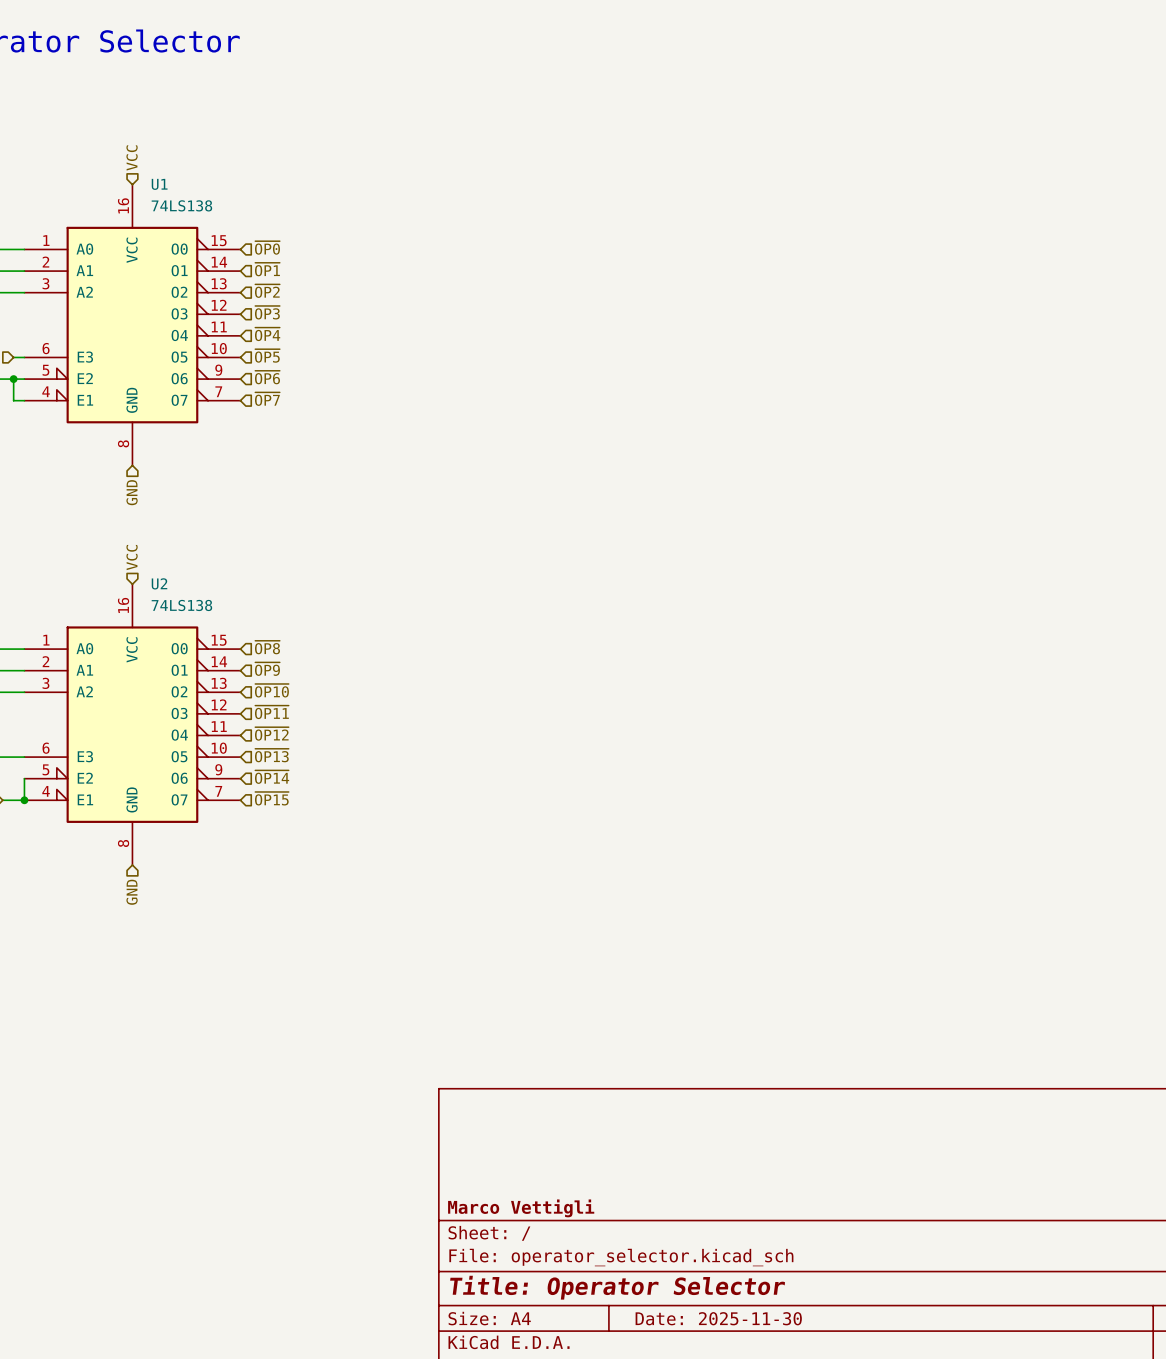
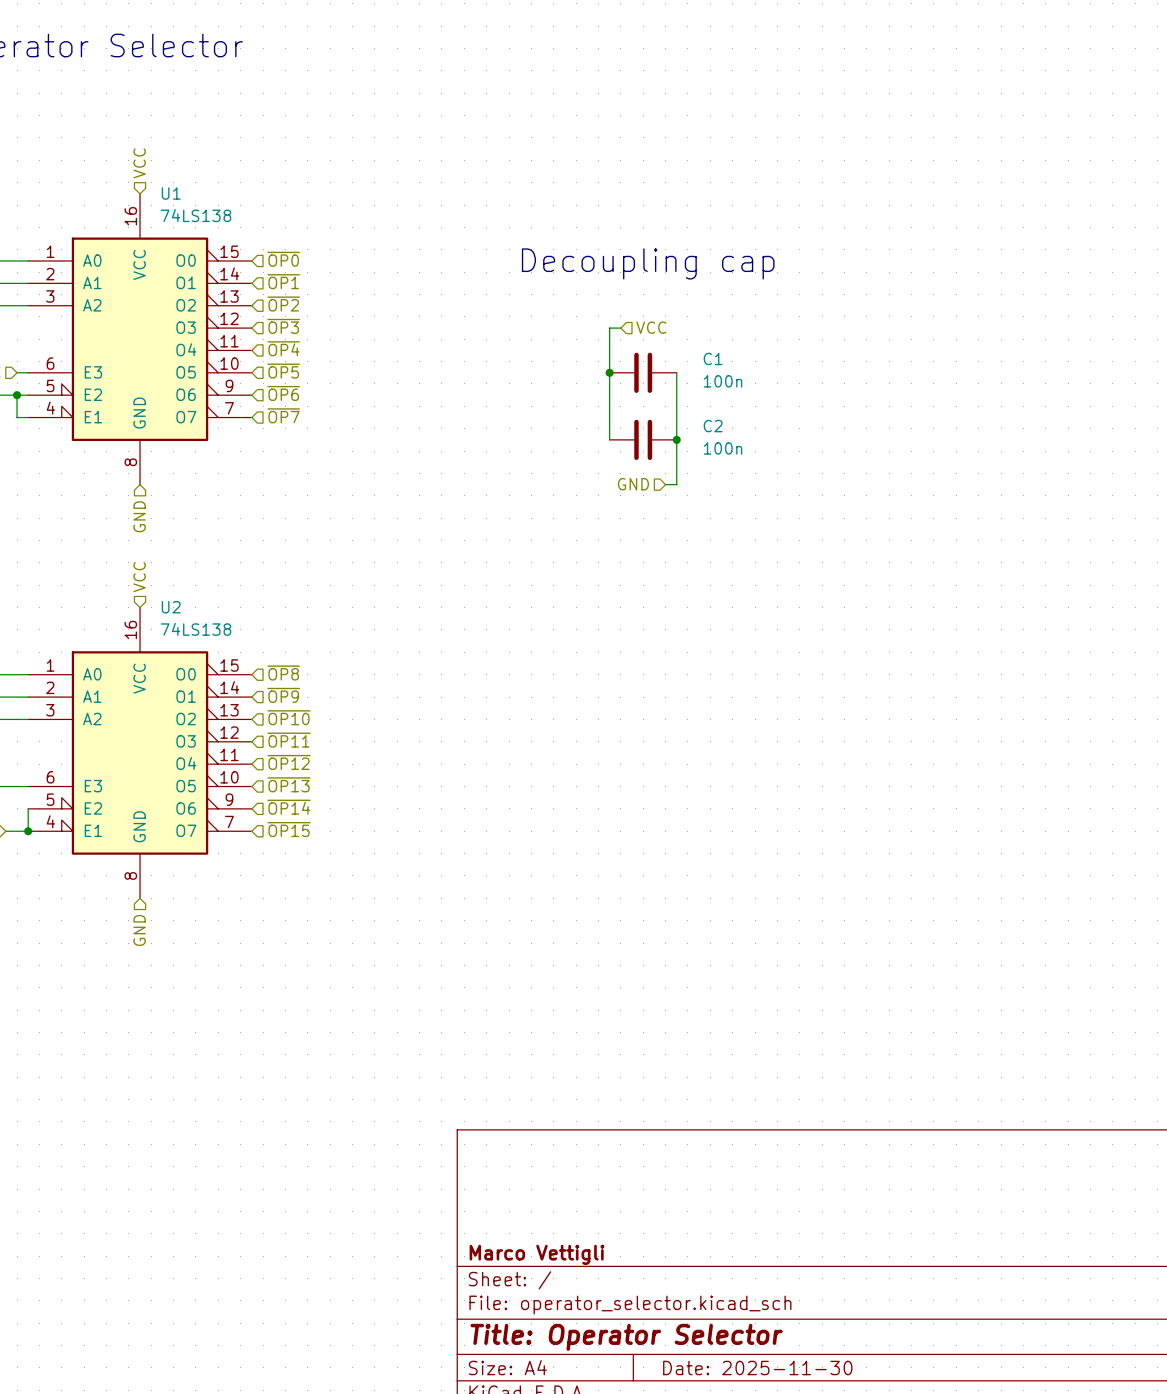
text: none -> Decoupling cap (648, 263)
hierarchical label: none -> VCC (651, 327)
wire: none -> (620, 328) (609, 328) (609, 439)
junction: none -> (609, 372)
C1: none -> 100n (643, 372)
wire: none -> (676, 372) (676, 484) (665, 484)
C2: none -> 100n (643, 439)
junction: none -> (676, 439)
hierarchical label: none -> GND (633, 484)

